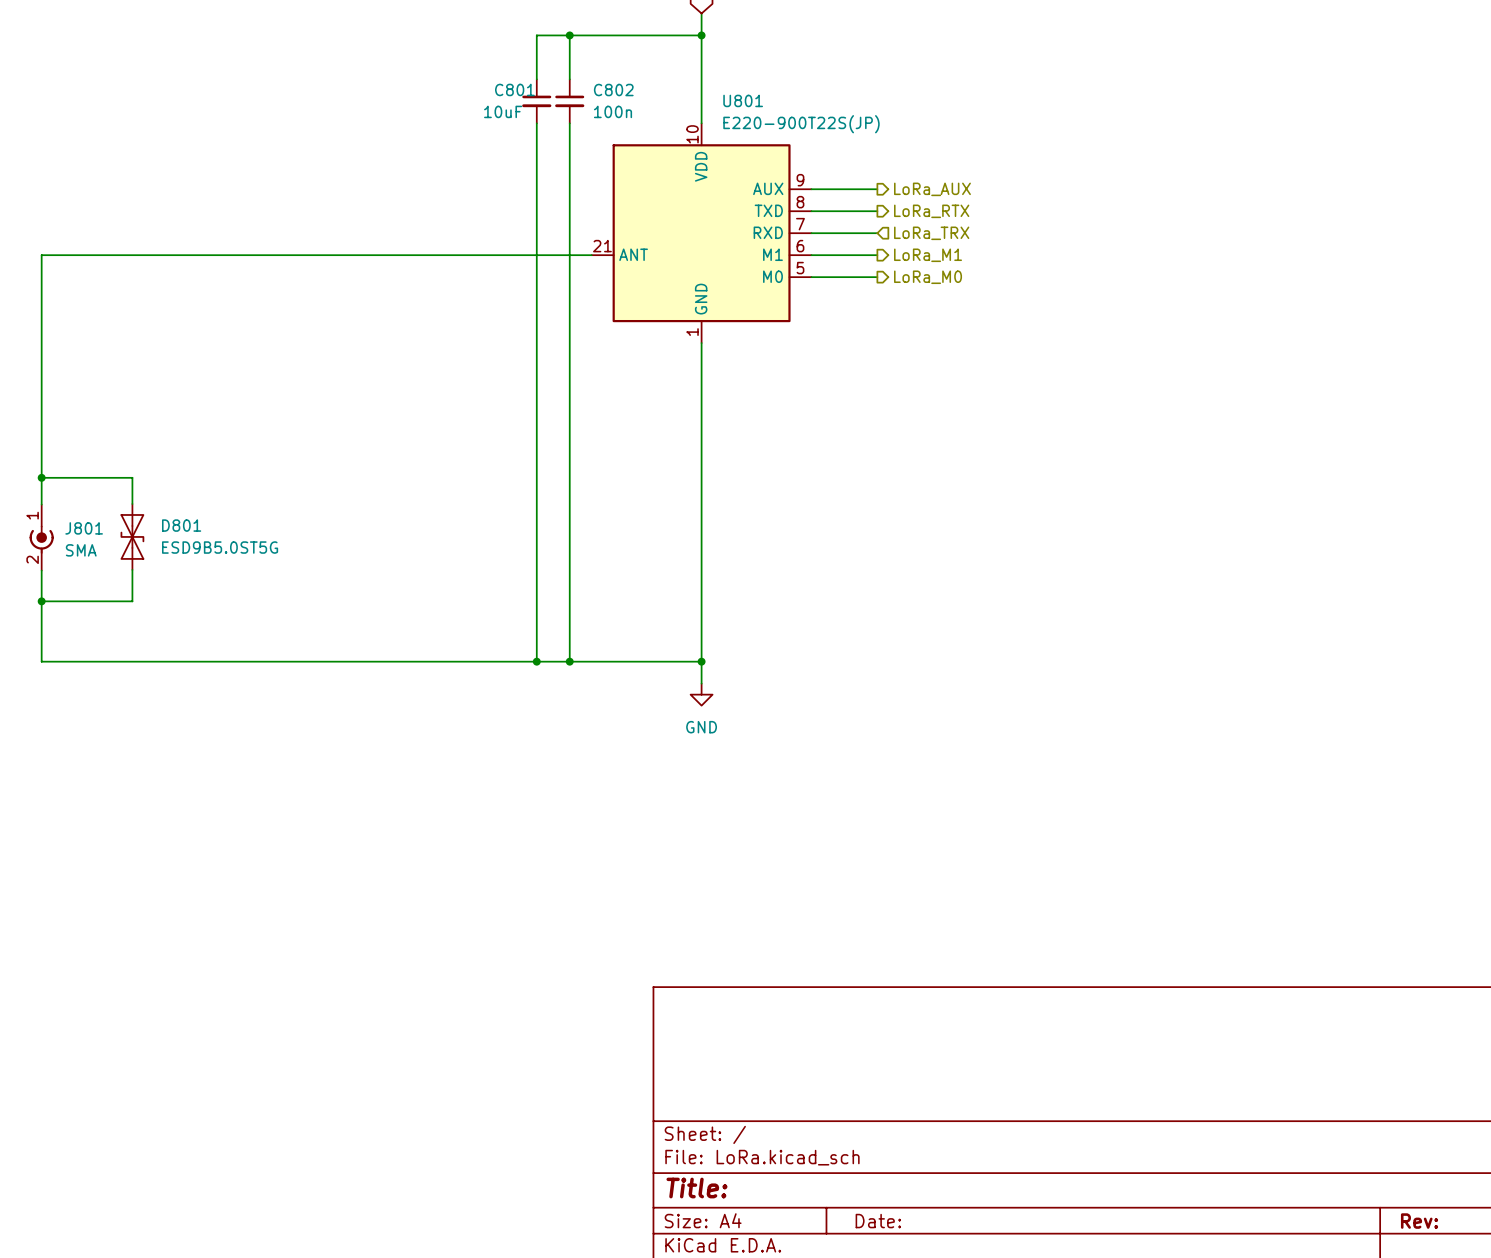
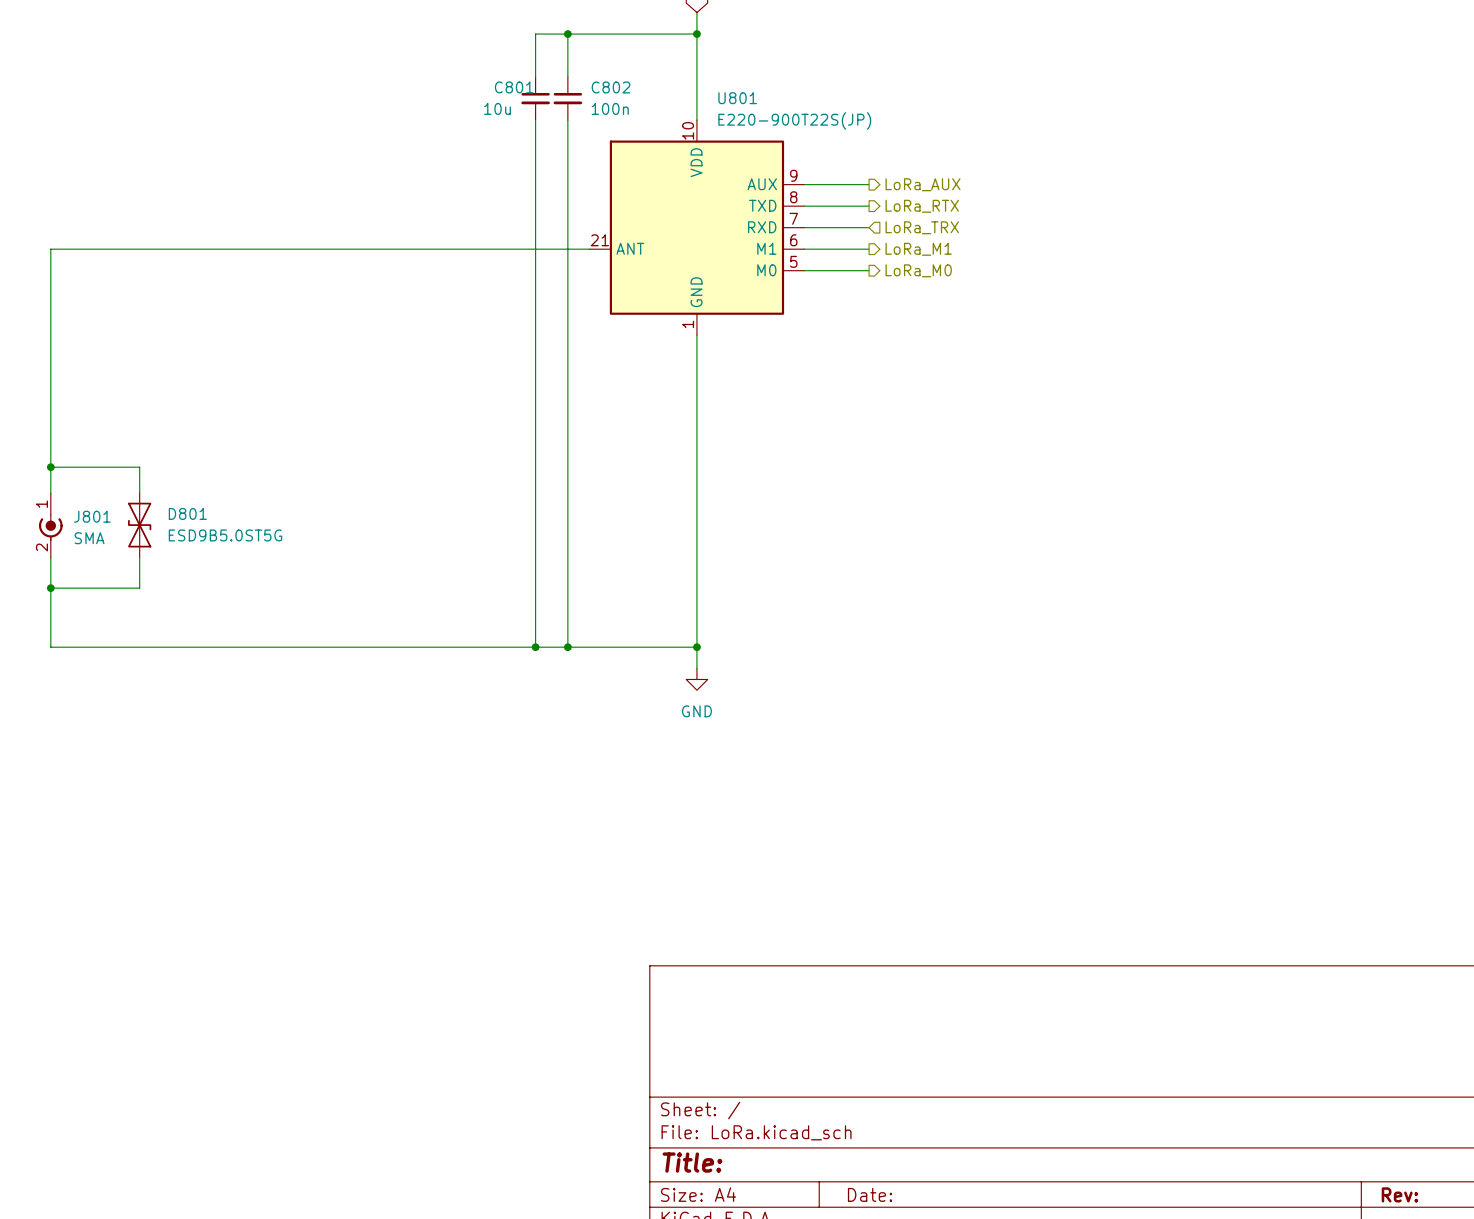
C801 value: 10uF (503, 111) -> 10u (497, 108)

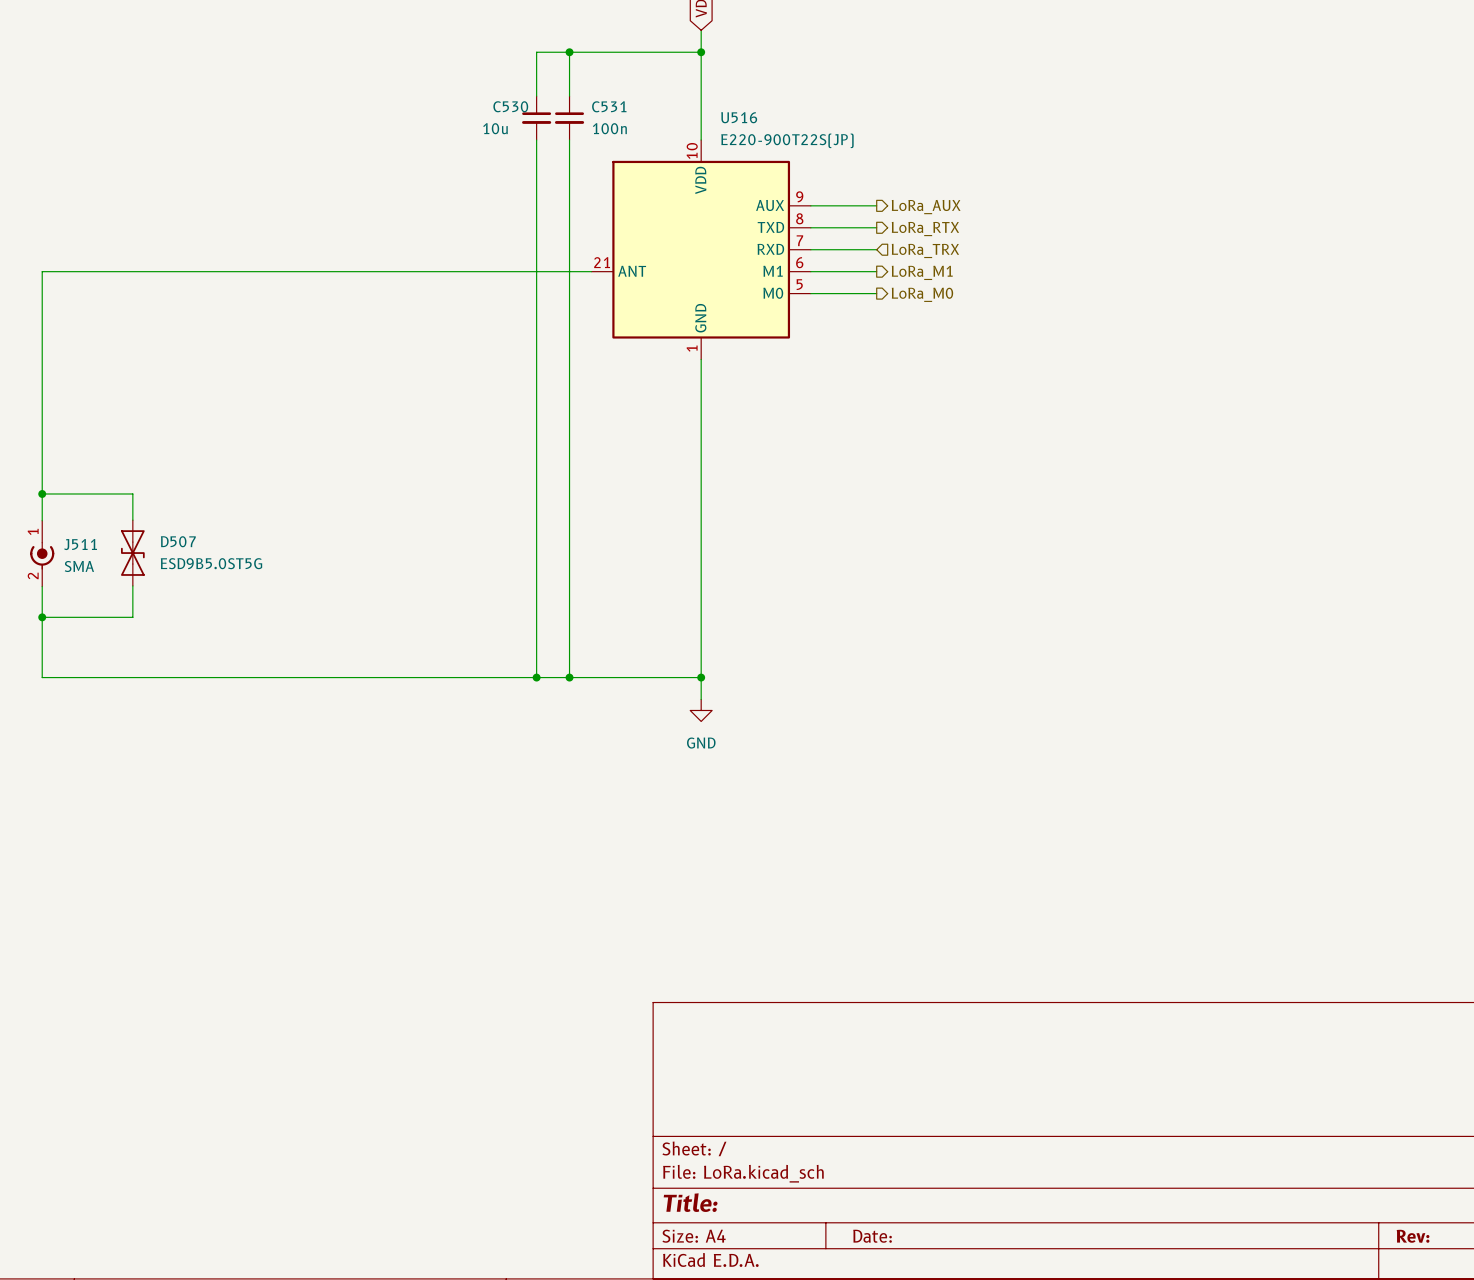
C801 name: C801 (514, 87) -> C530 (510, 106)
C802 name: C802 (610, 87) -> C531 (609, 106)
U801 name: U801 (737, 98) -> U516 (739, 117)
D801 name: D801 (187, 513) -> D507 (178, 541)
J801 name: J801 (92, 516) -> J511 (80, 544)

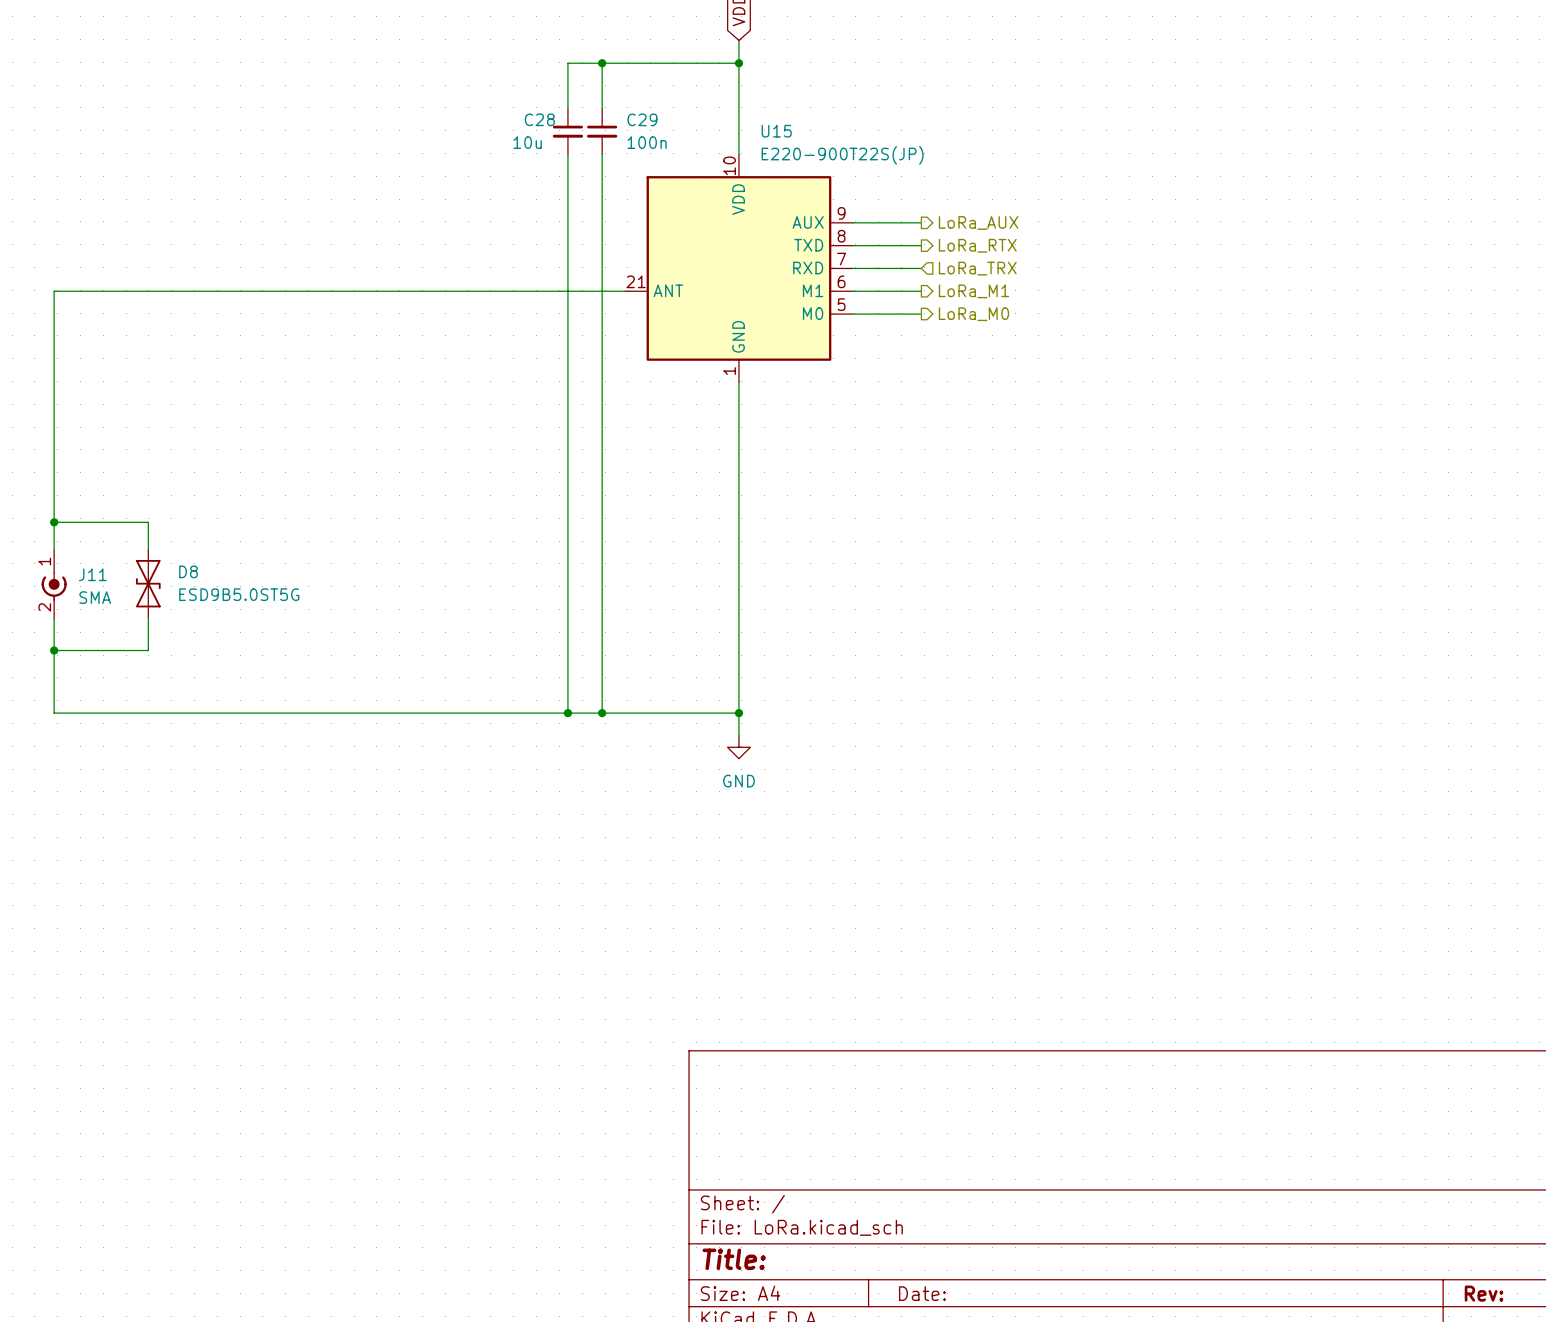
C530 name: C530 (510, 106) -> C28 (539, 119)
C531 name: C531 (609, 106) -> C29 (642, 119)
U516 name: U516 (739, 117) -> U15 (776, 131)
D507 name: D507 (178, 541) -> D8 (188, 571)
J511 name: J511 (80, 544) -> J11 (92, 574)

